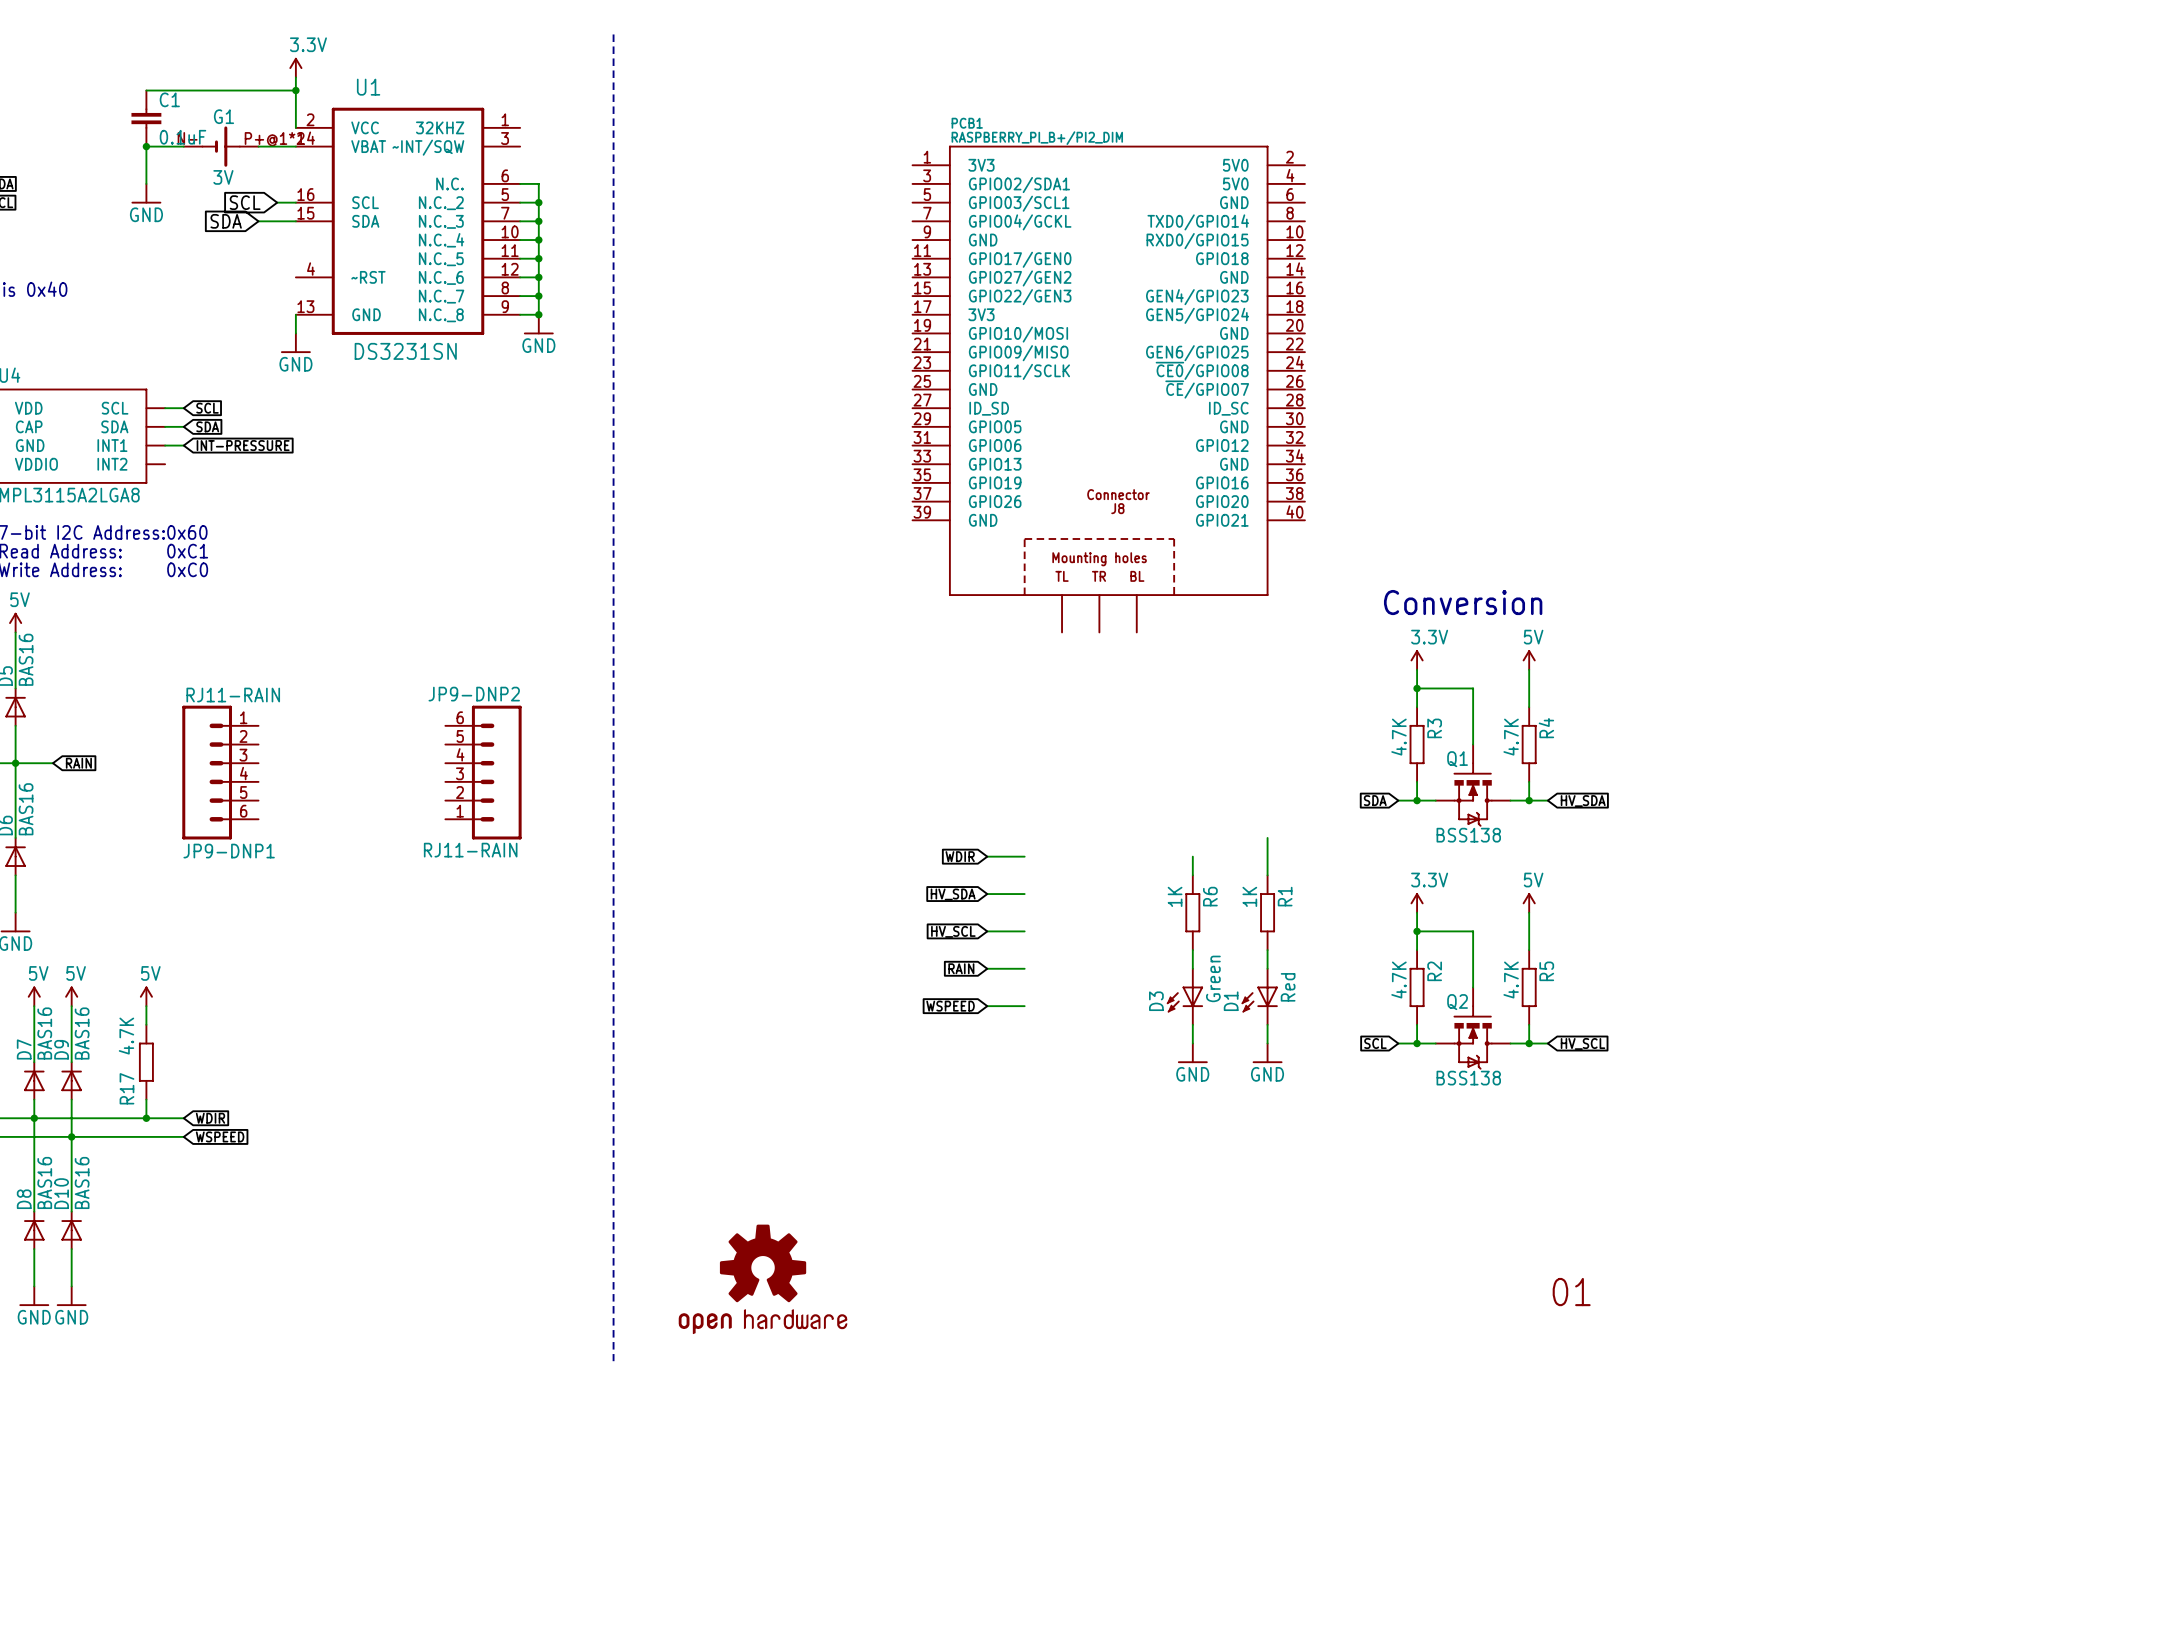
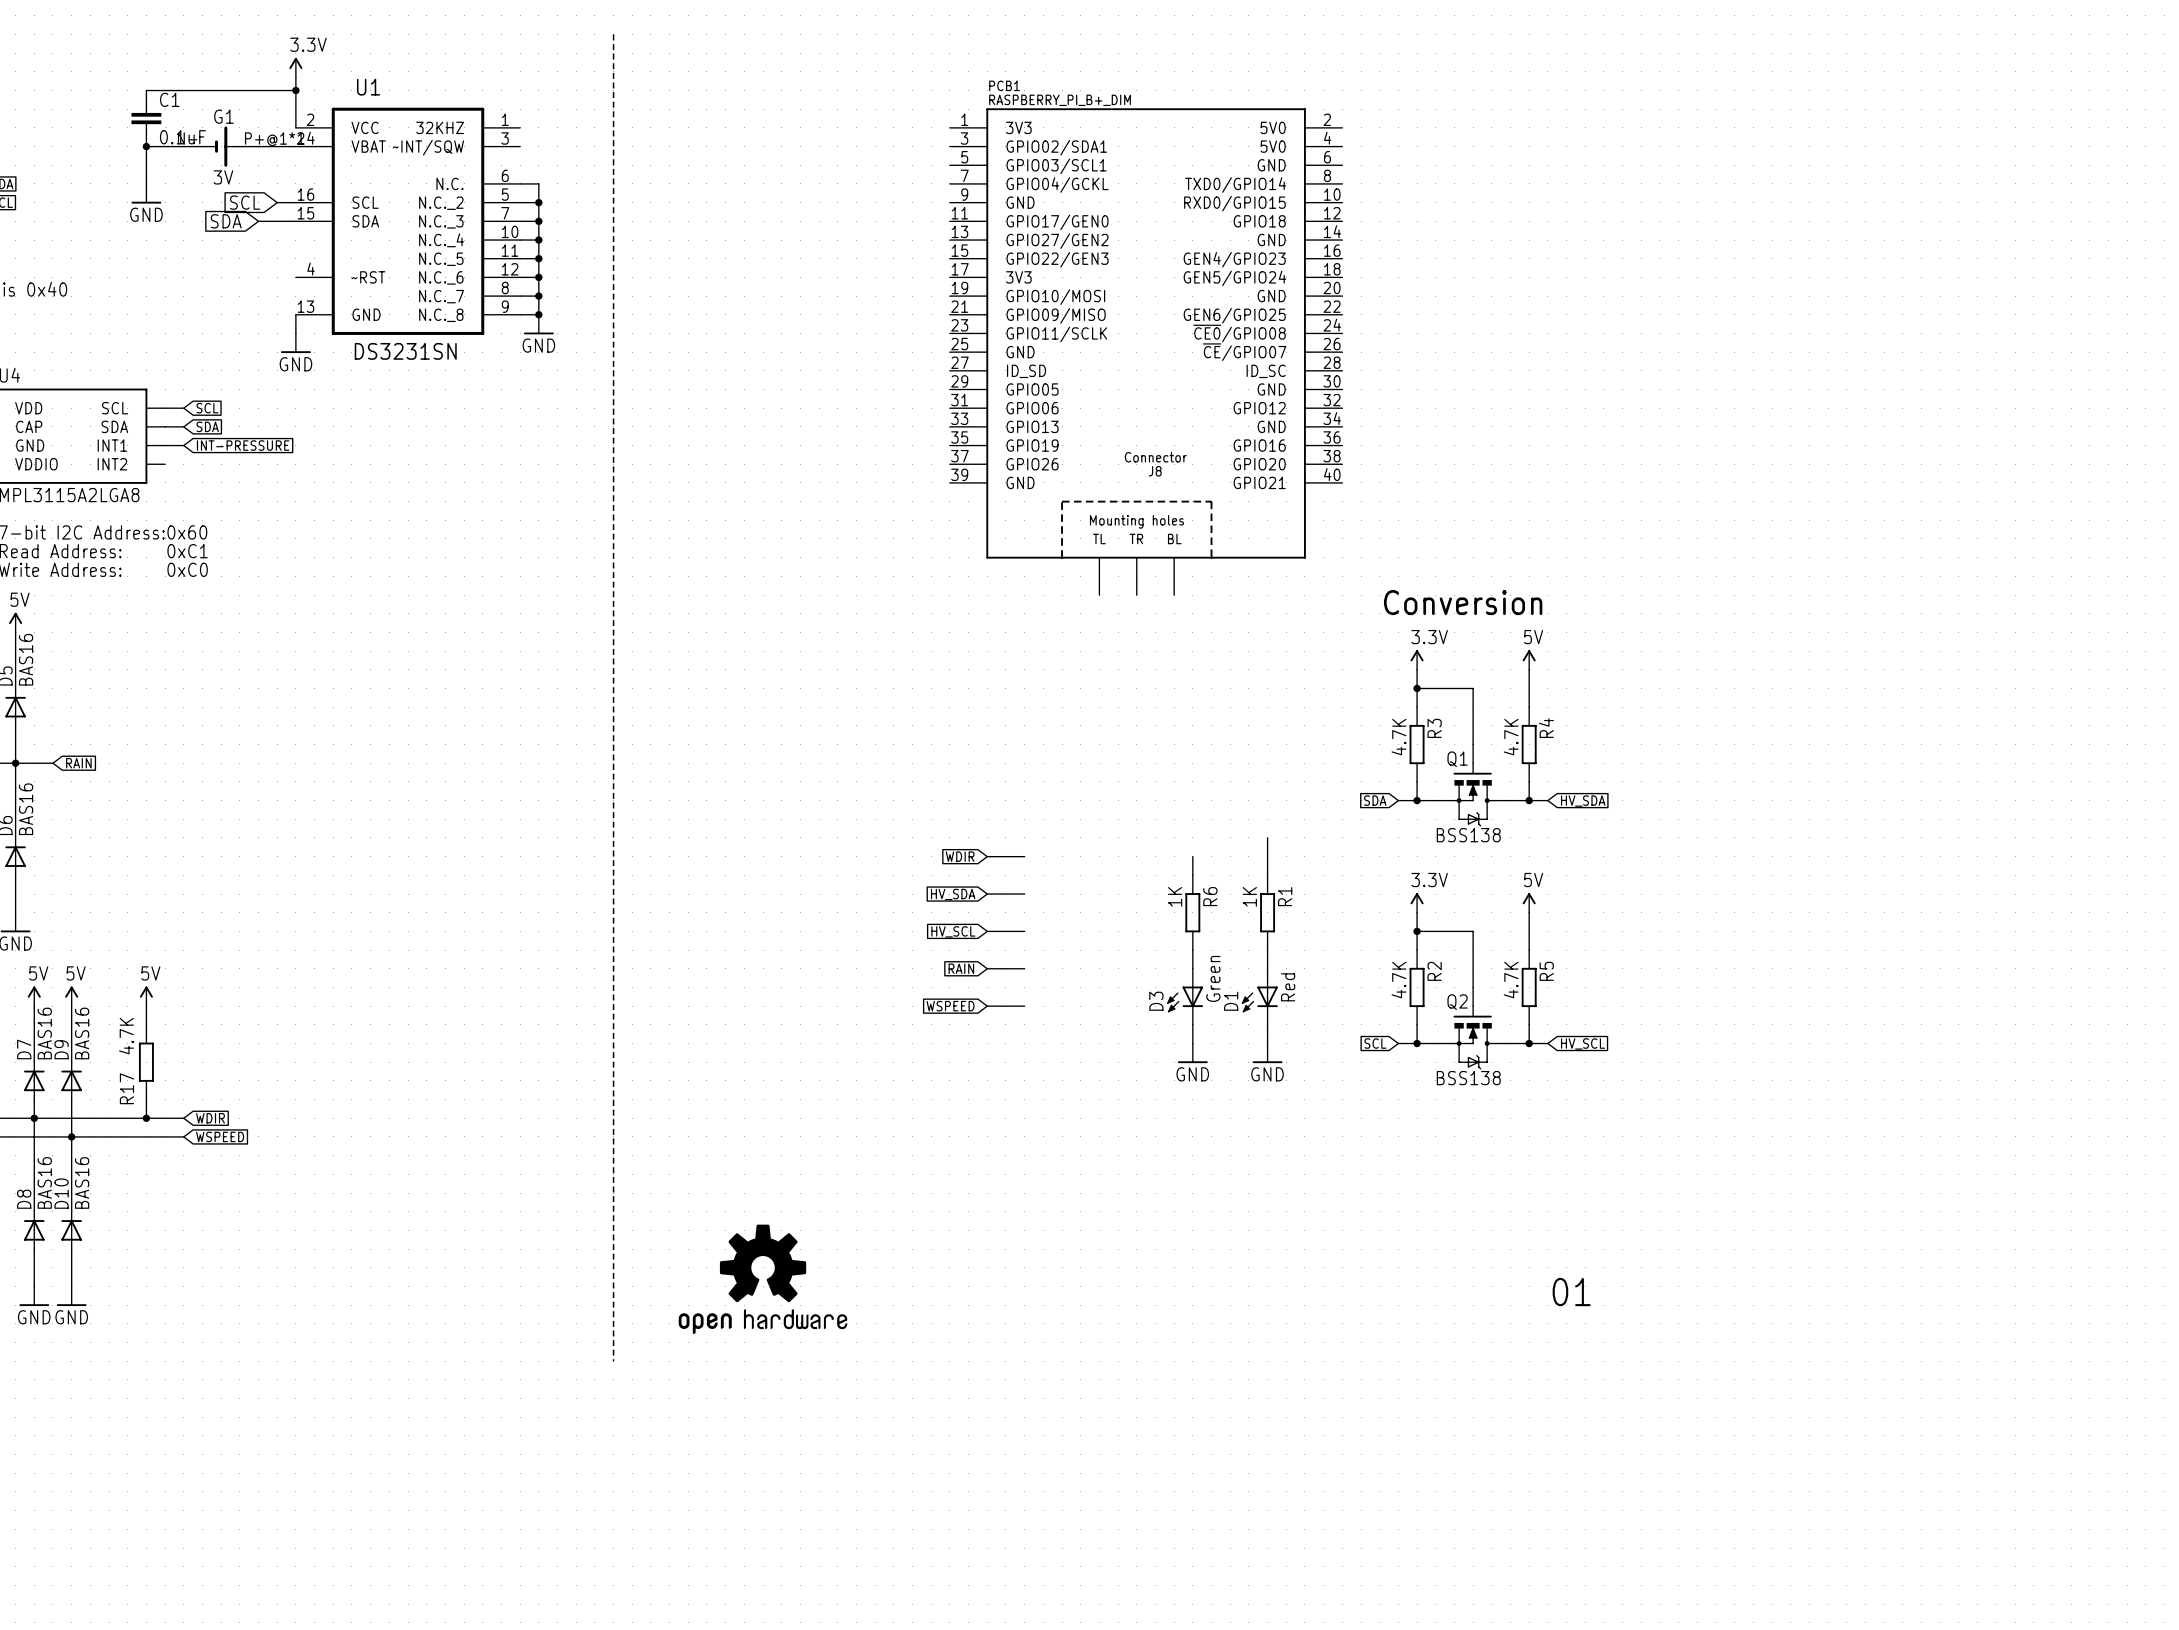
PCB1 value: RASPBERRY_PI_B+/PI2_DIM (1037, 138) -> RASPBERRY_PI_B+_DIM (1060, 100)
PCB1 position: (1108, 389) -> (1146, 351)
JP9-DNP1: RJ11-RAIN (220, 772) -> none
JP9-DNP2: RJ11-RAIN (483, 772) -> none

